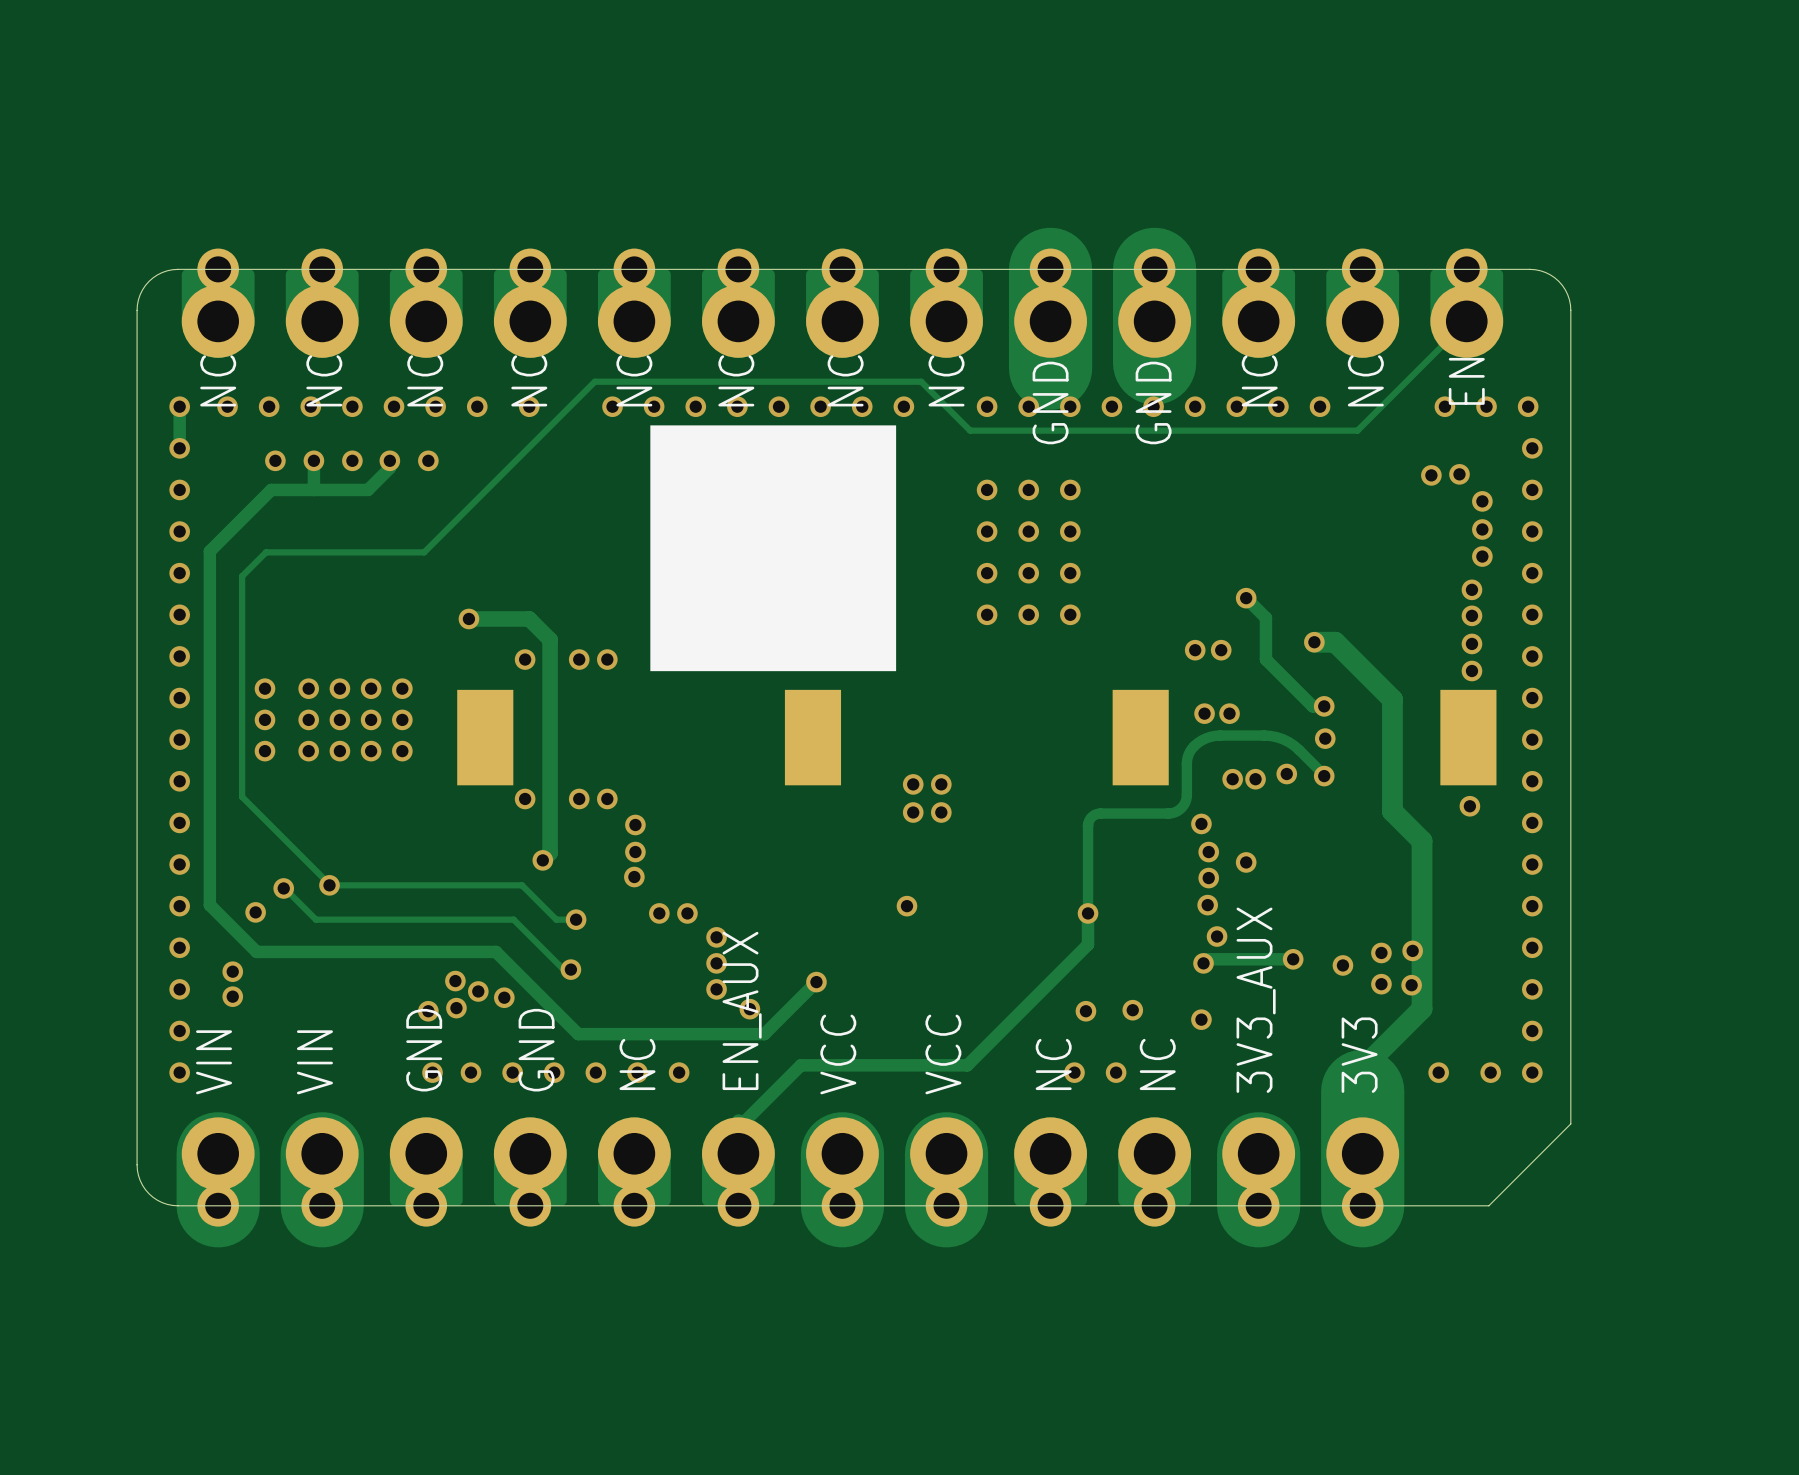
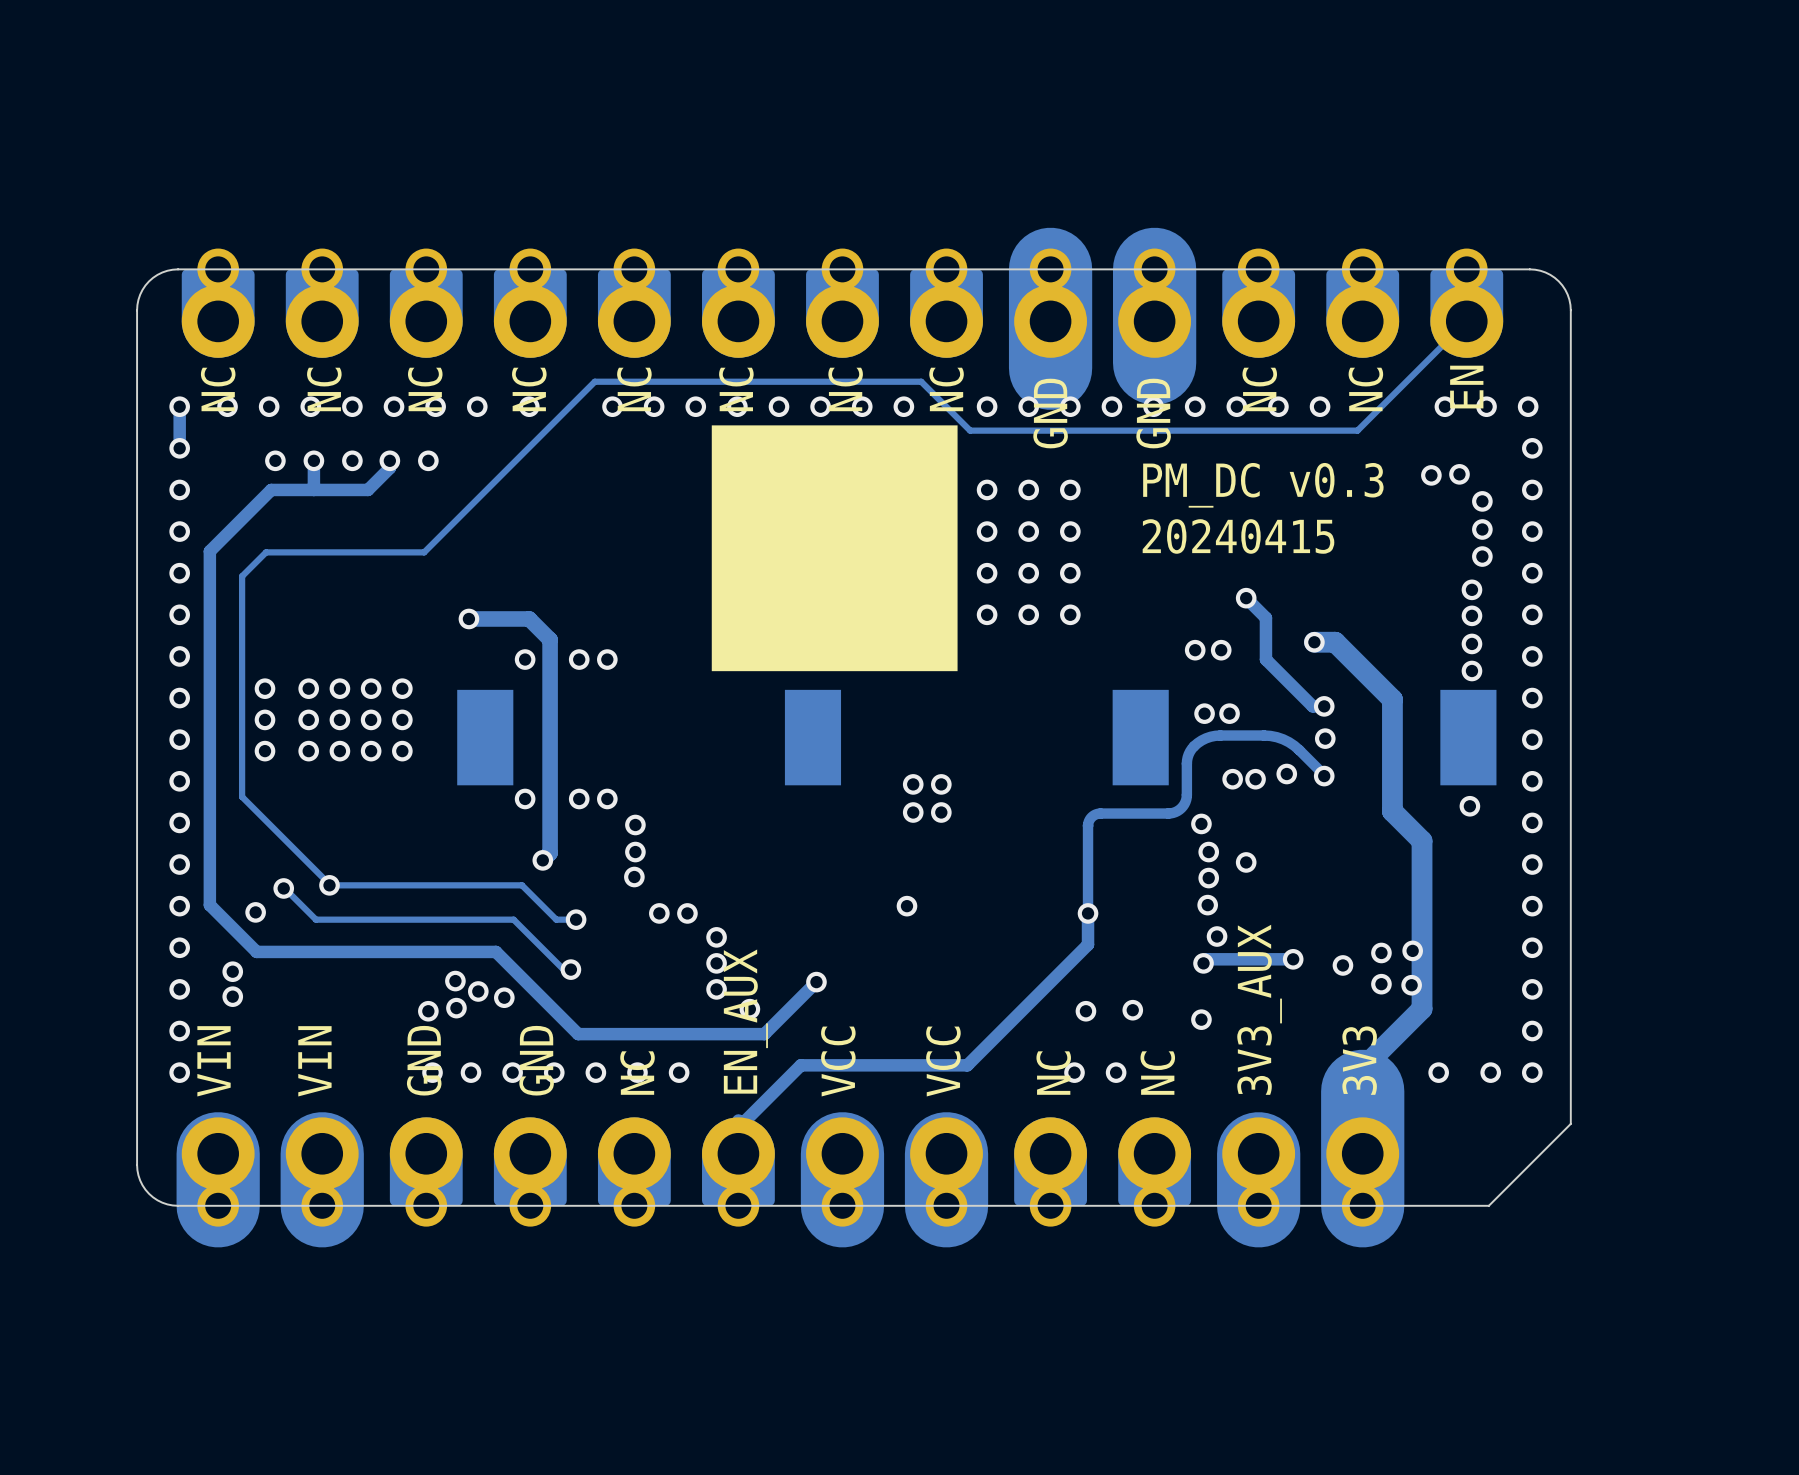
text: none -> PM_DC v0.3 (1263, 485)
text: none -> 20240415 (1238, 536)
drawing position: (773, 548) -> (834, 548)

